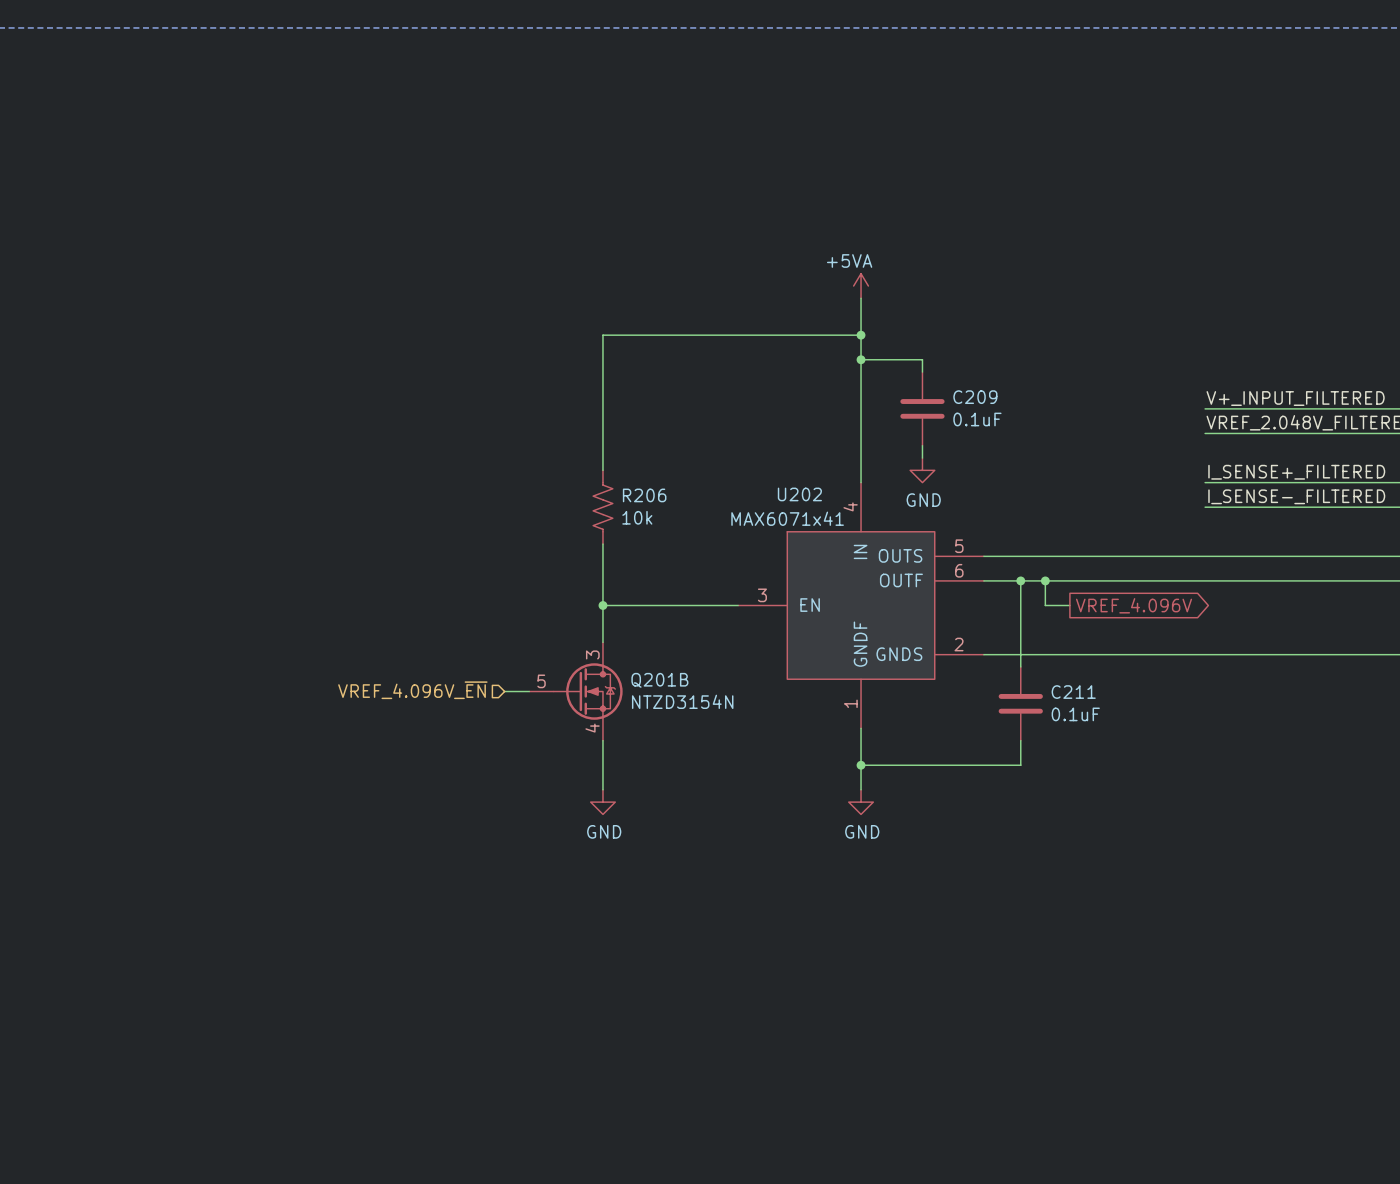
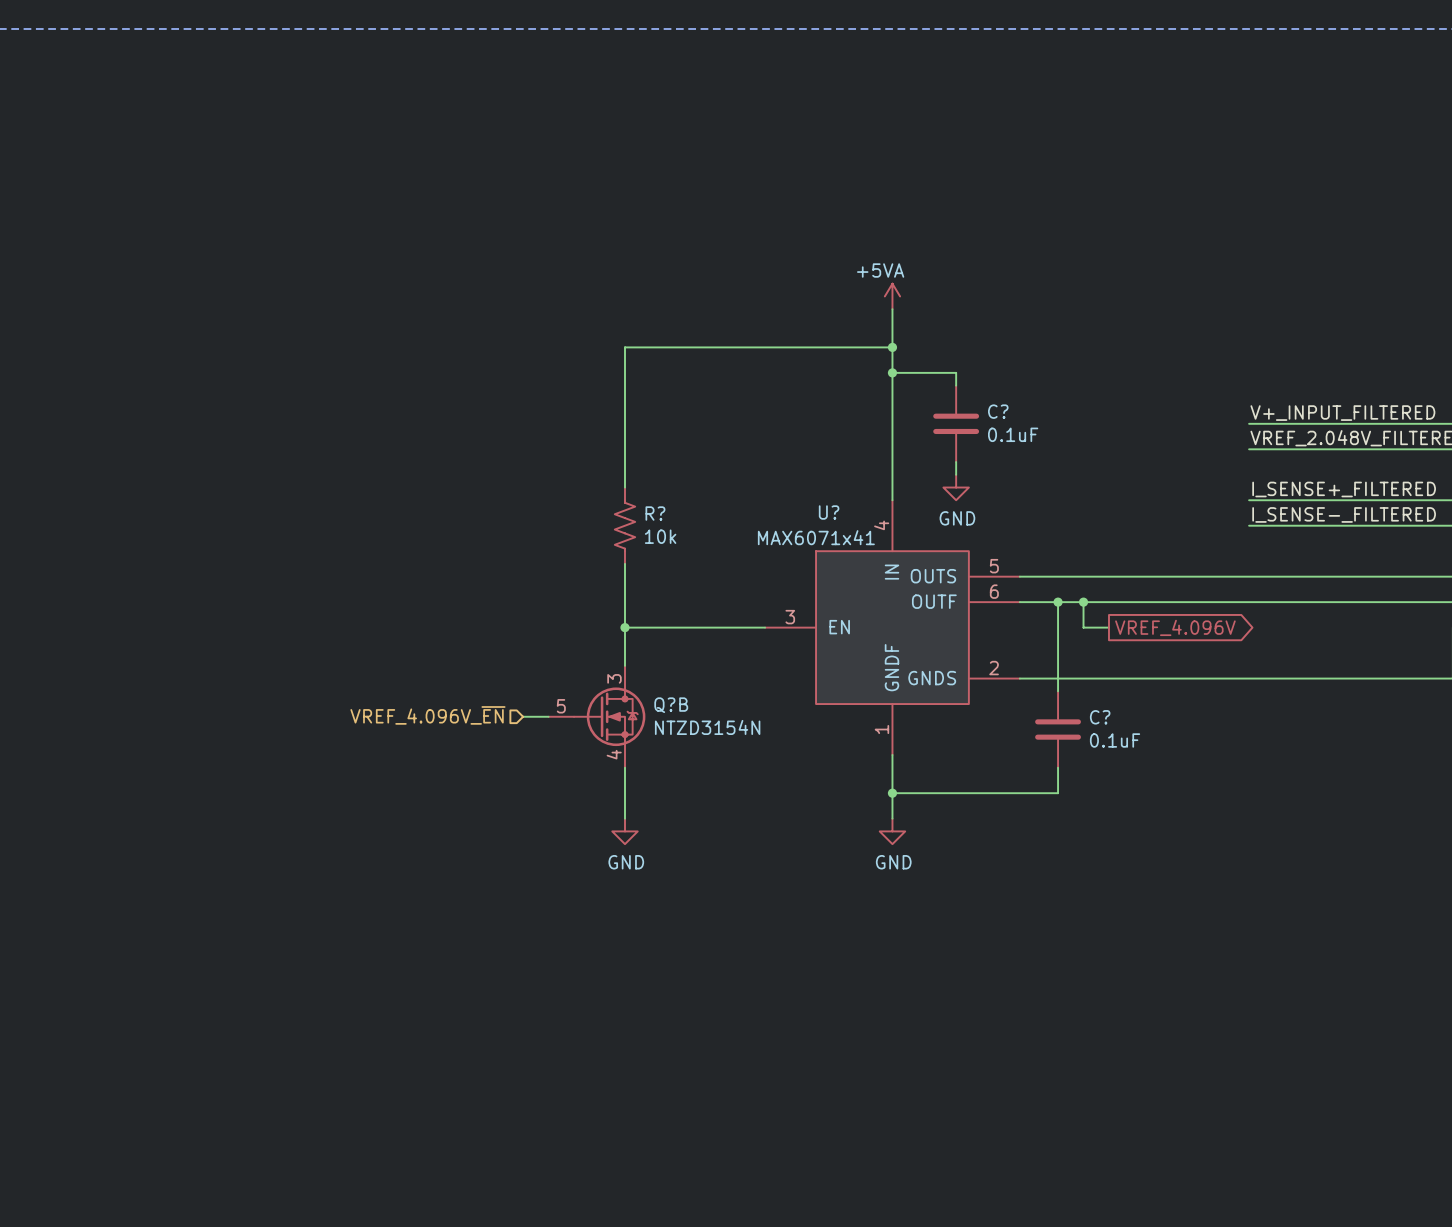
C209 name: C209 (975, 397) -> C? (998, 411)
U202 name: U202 (799, 494) -> U? (829, 512)
R206 name: R206 (644, 495) -> R? (655, 513)
Q201B name: Q201B (659, 680) -> Q?B (671, 705)
C211 name: C211 (1073, 692) -> C? (1100, 717)

